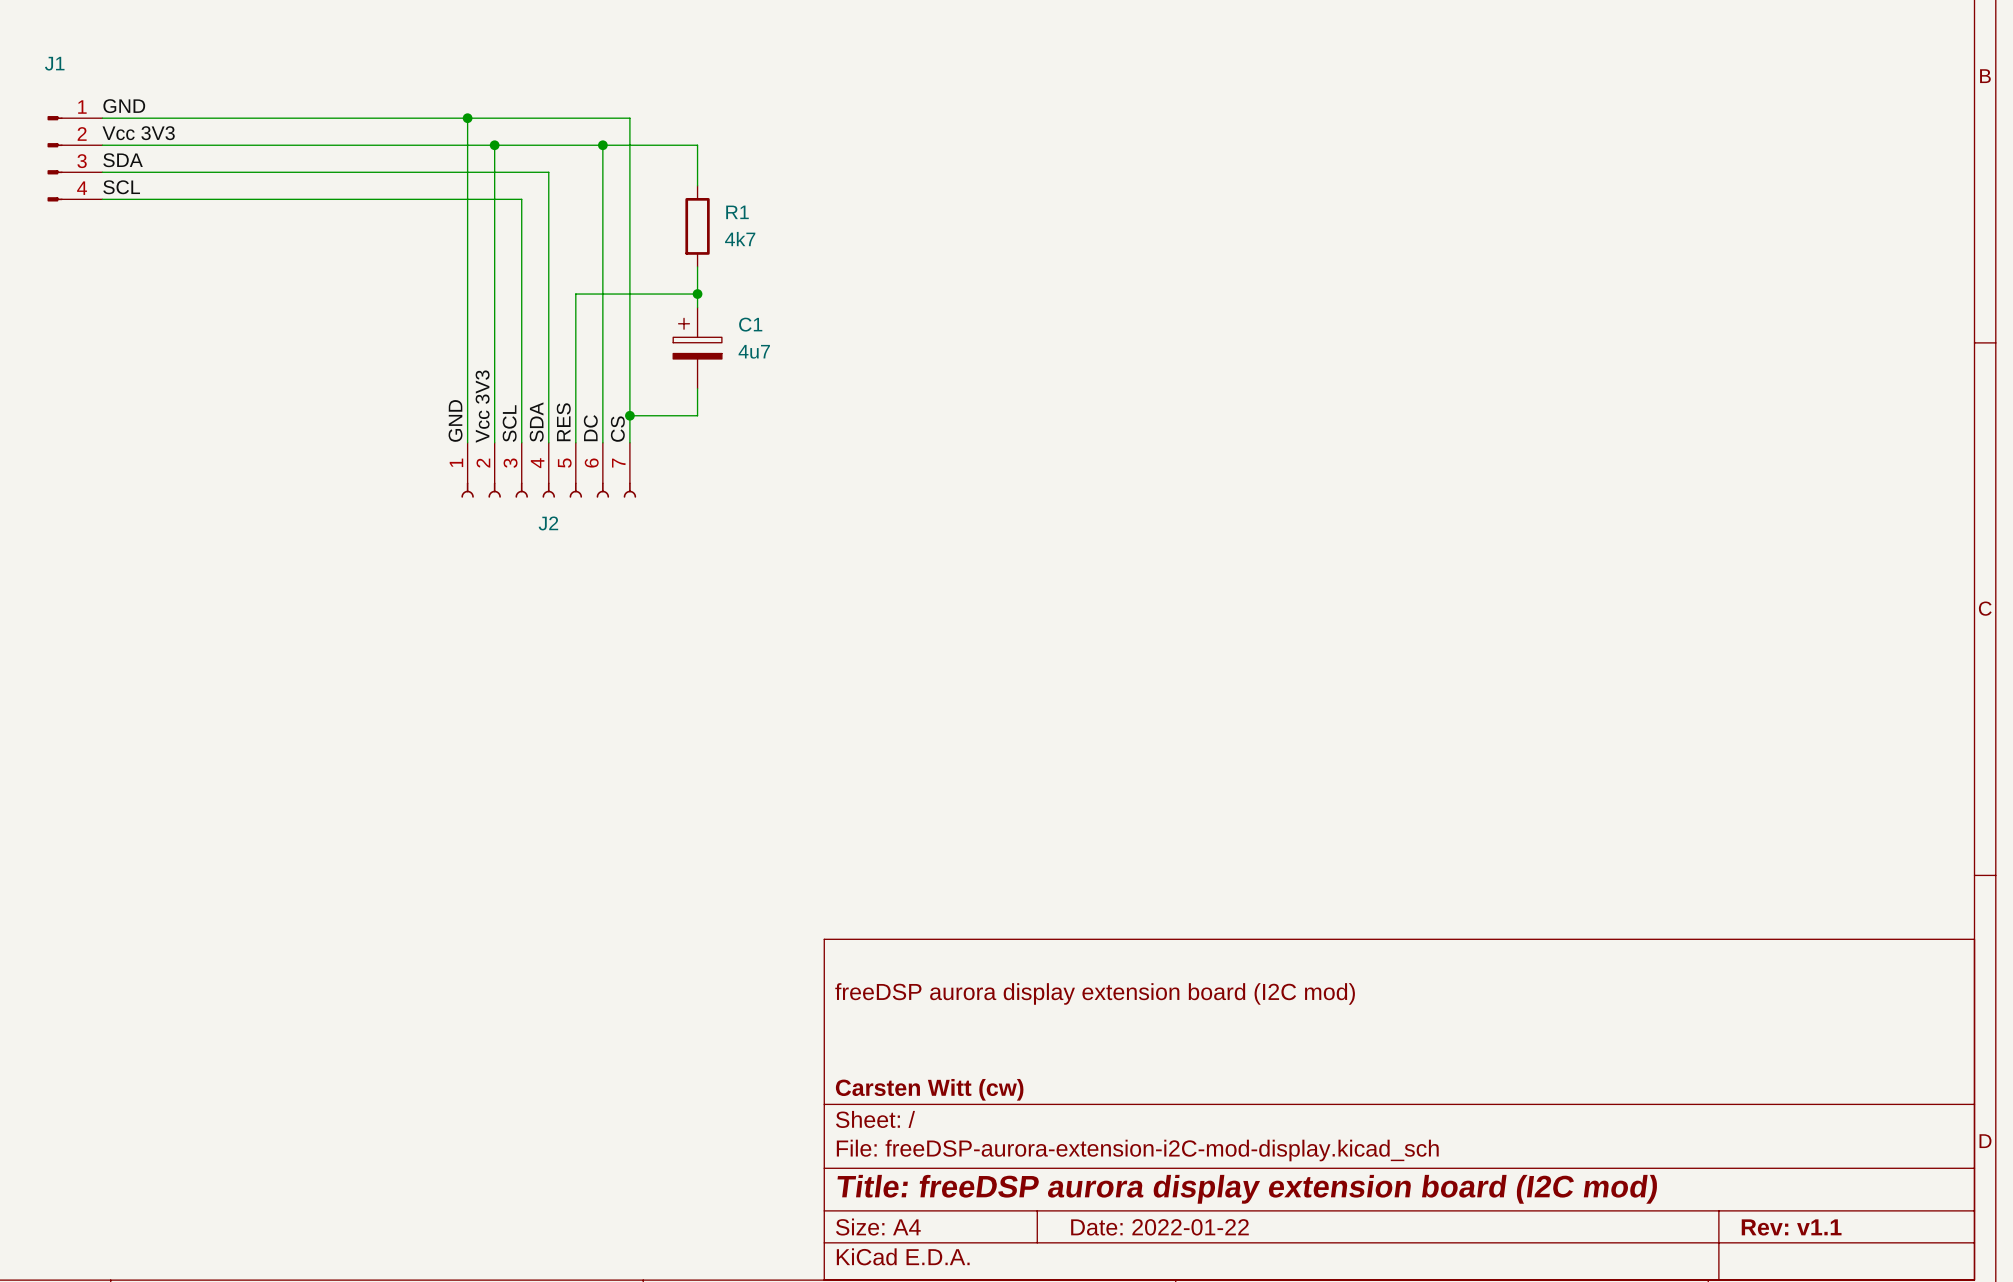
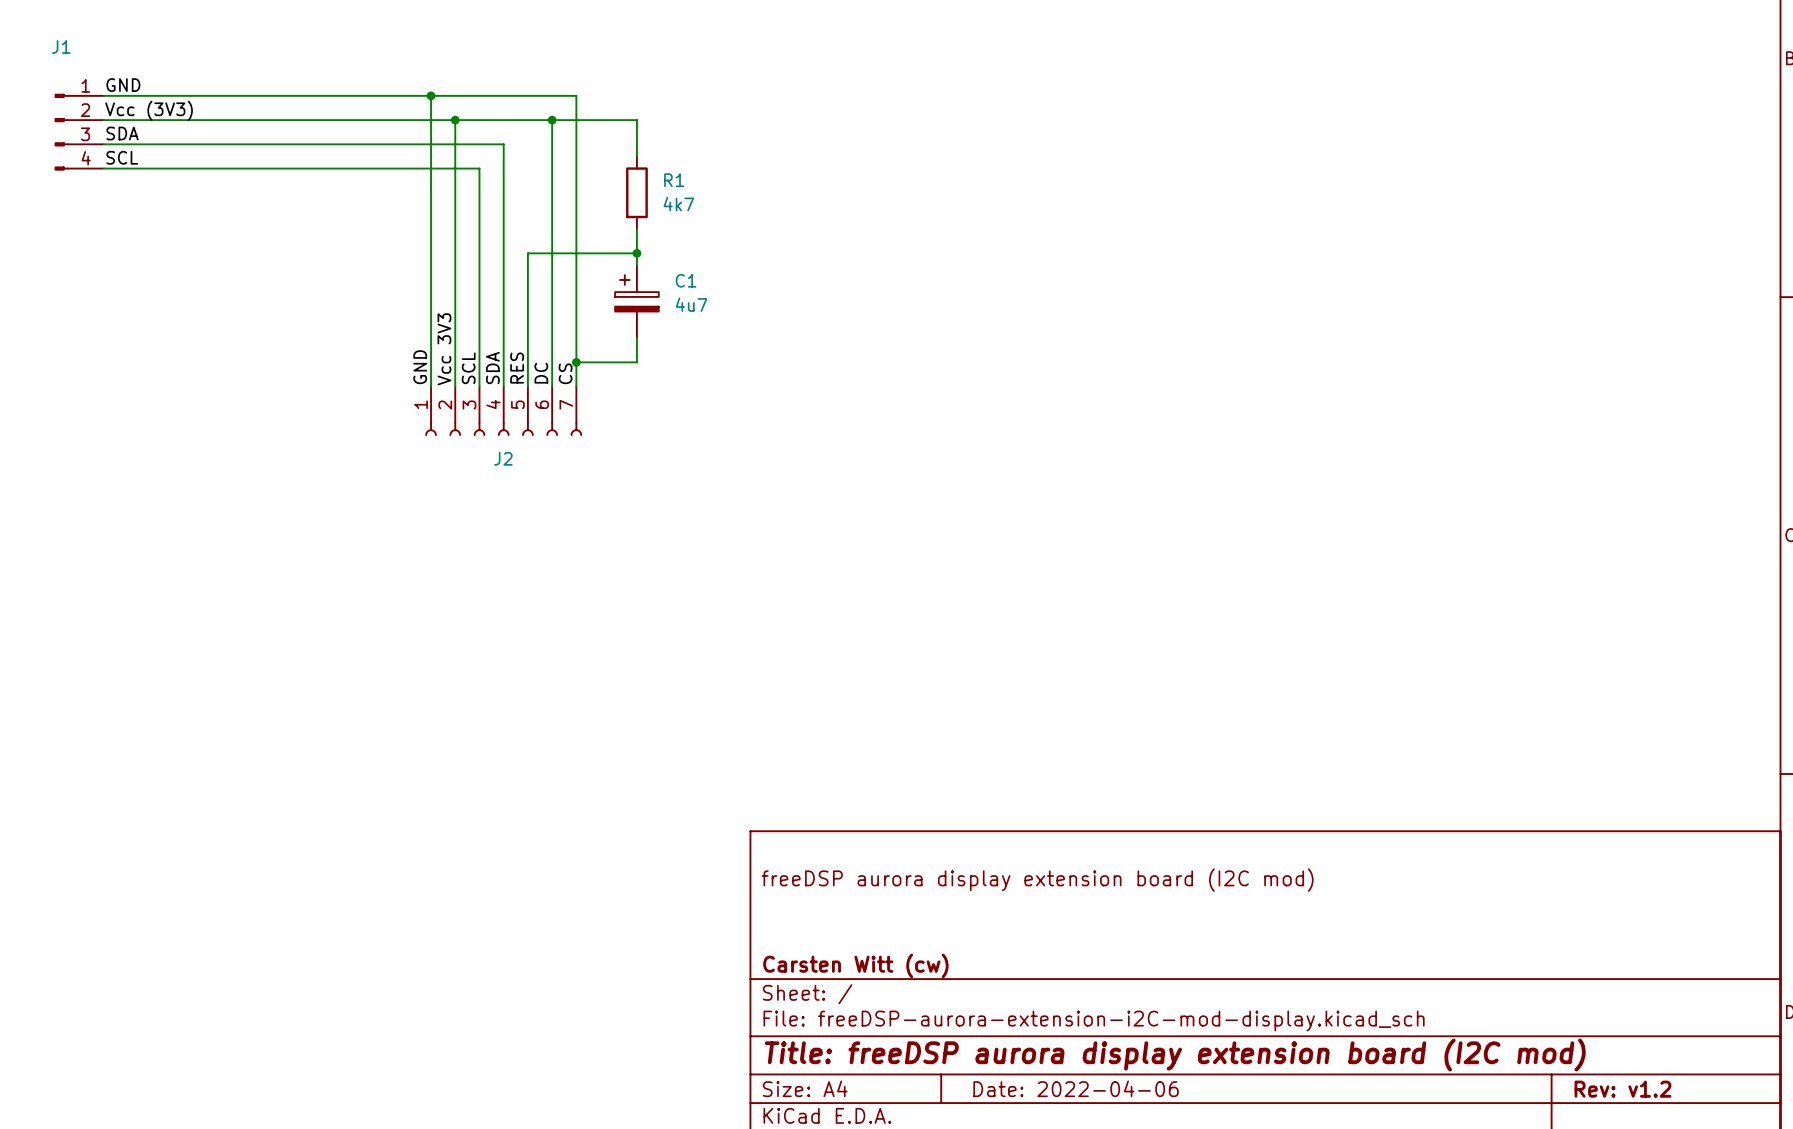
label: Vcc 3V3 (138, 133) -> Vcc (3V3) (149, 110)
title block: Date: 2022-01-22 (1159, 1227) -> Date: 2022-04-06 (1076, 1088)
title block: Rev: v1.1 (1791, 1227) -> Rev: v1.2 (1622, 1089)

